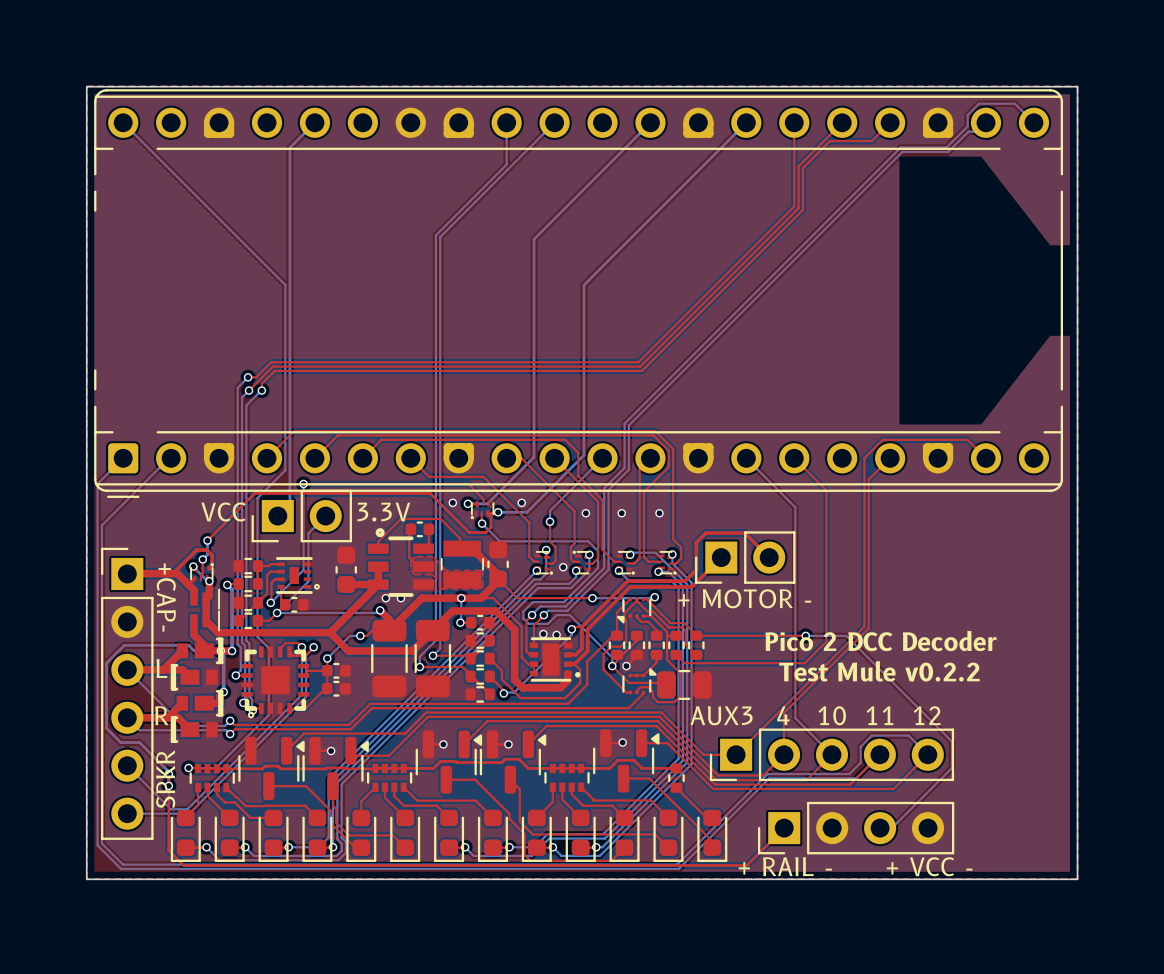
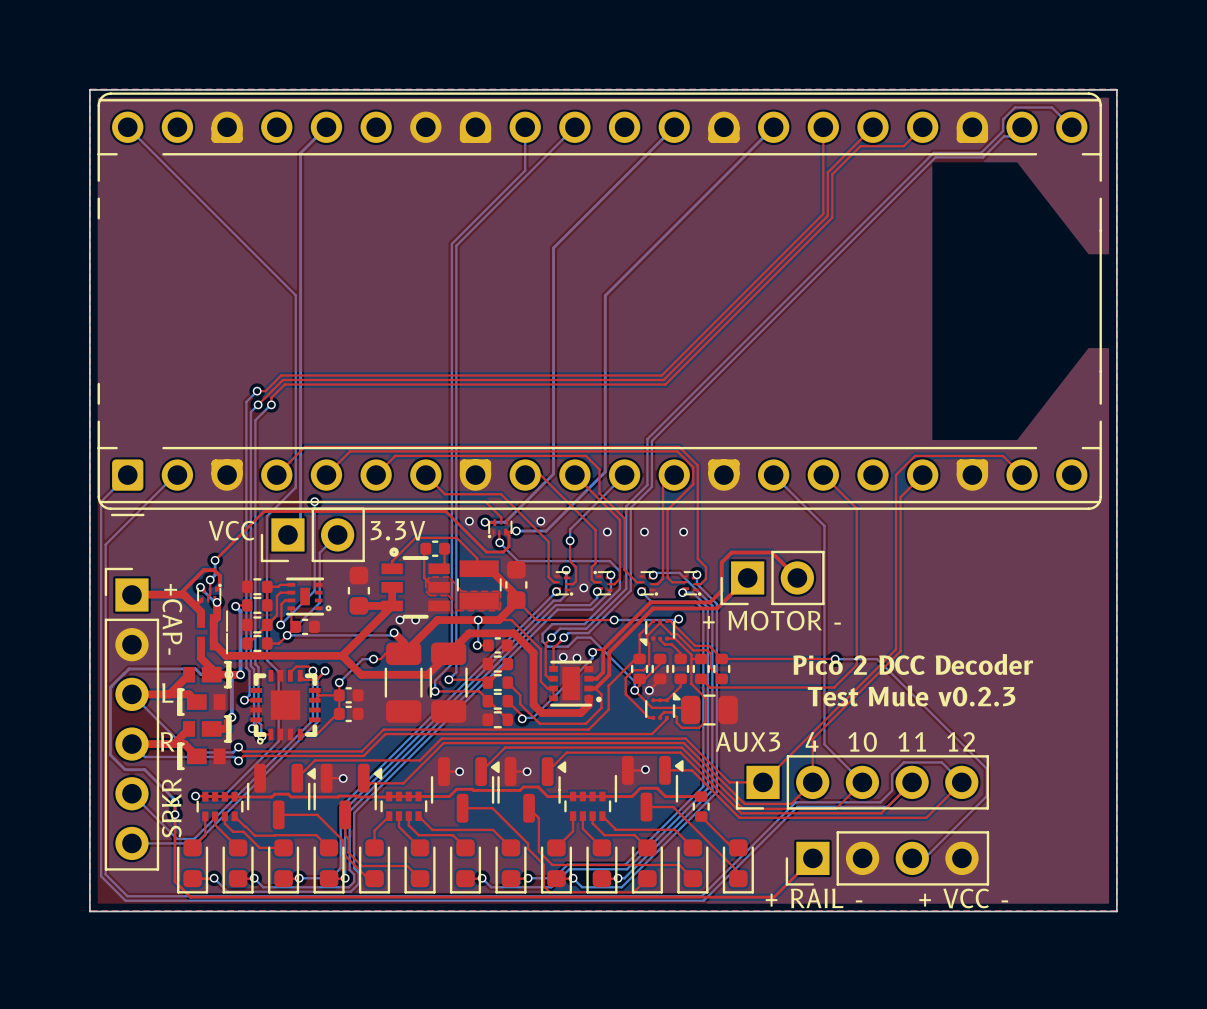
text: Test Mule v0.2.2 (879, 671) -> Test Mule v0.2.3 (911, 695)

